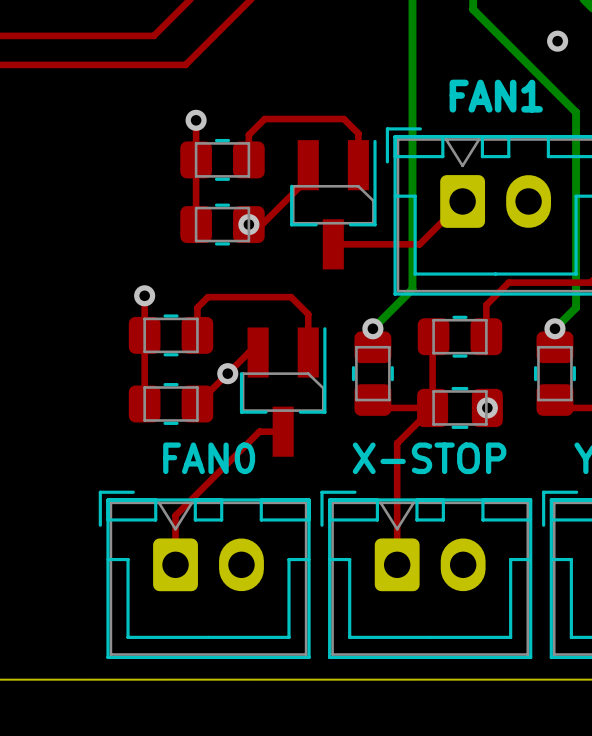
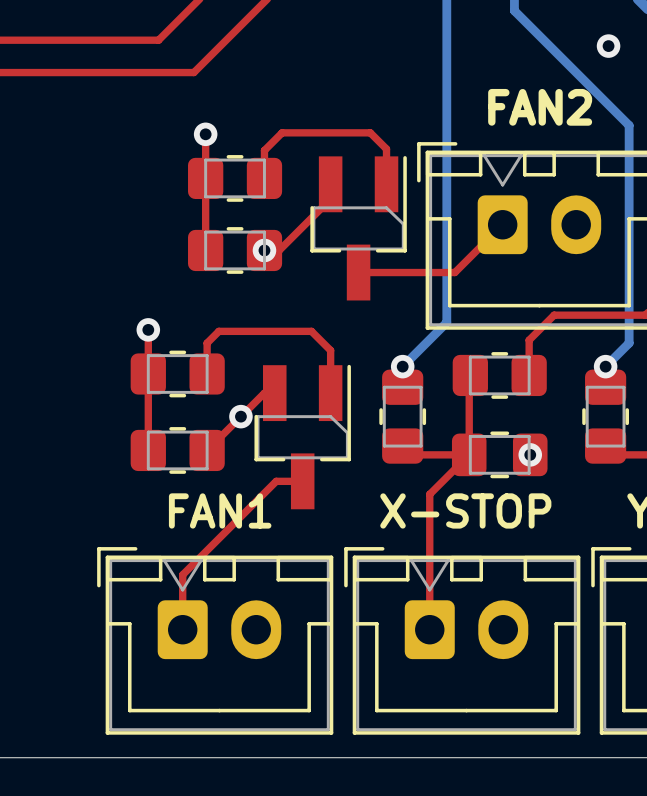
text: FAN1 (496, 96) -> FAN2 (540, 107)
text: FAN0 (209, 458) -> FAN1 (220, 510)

